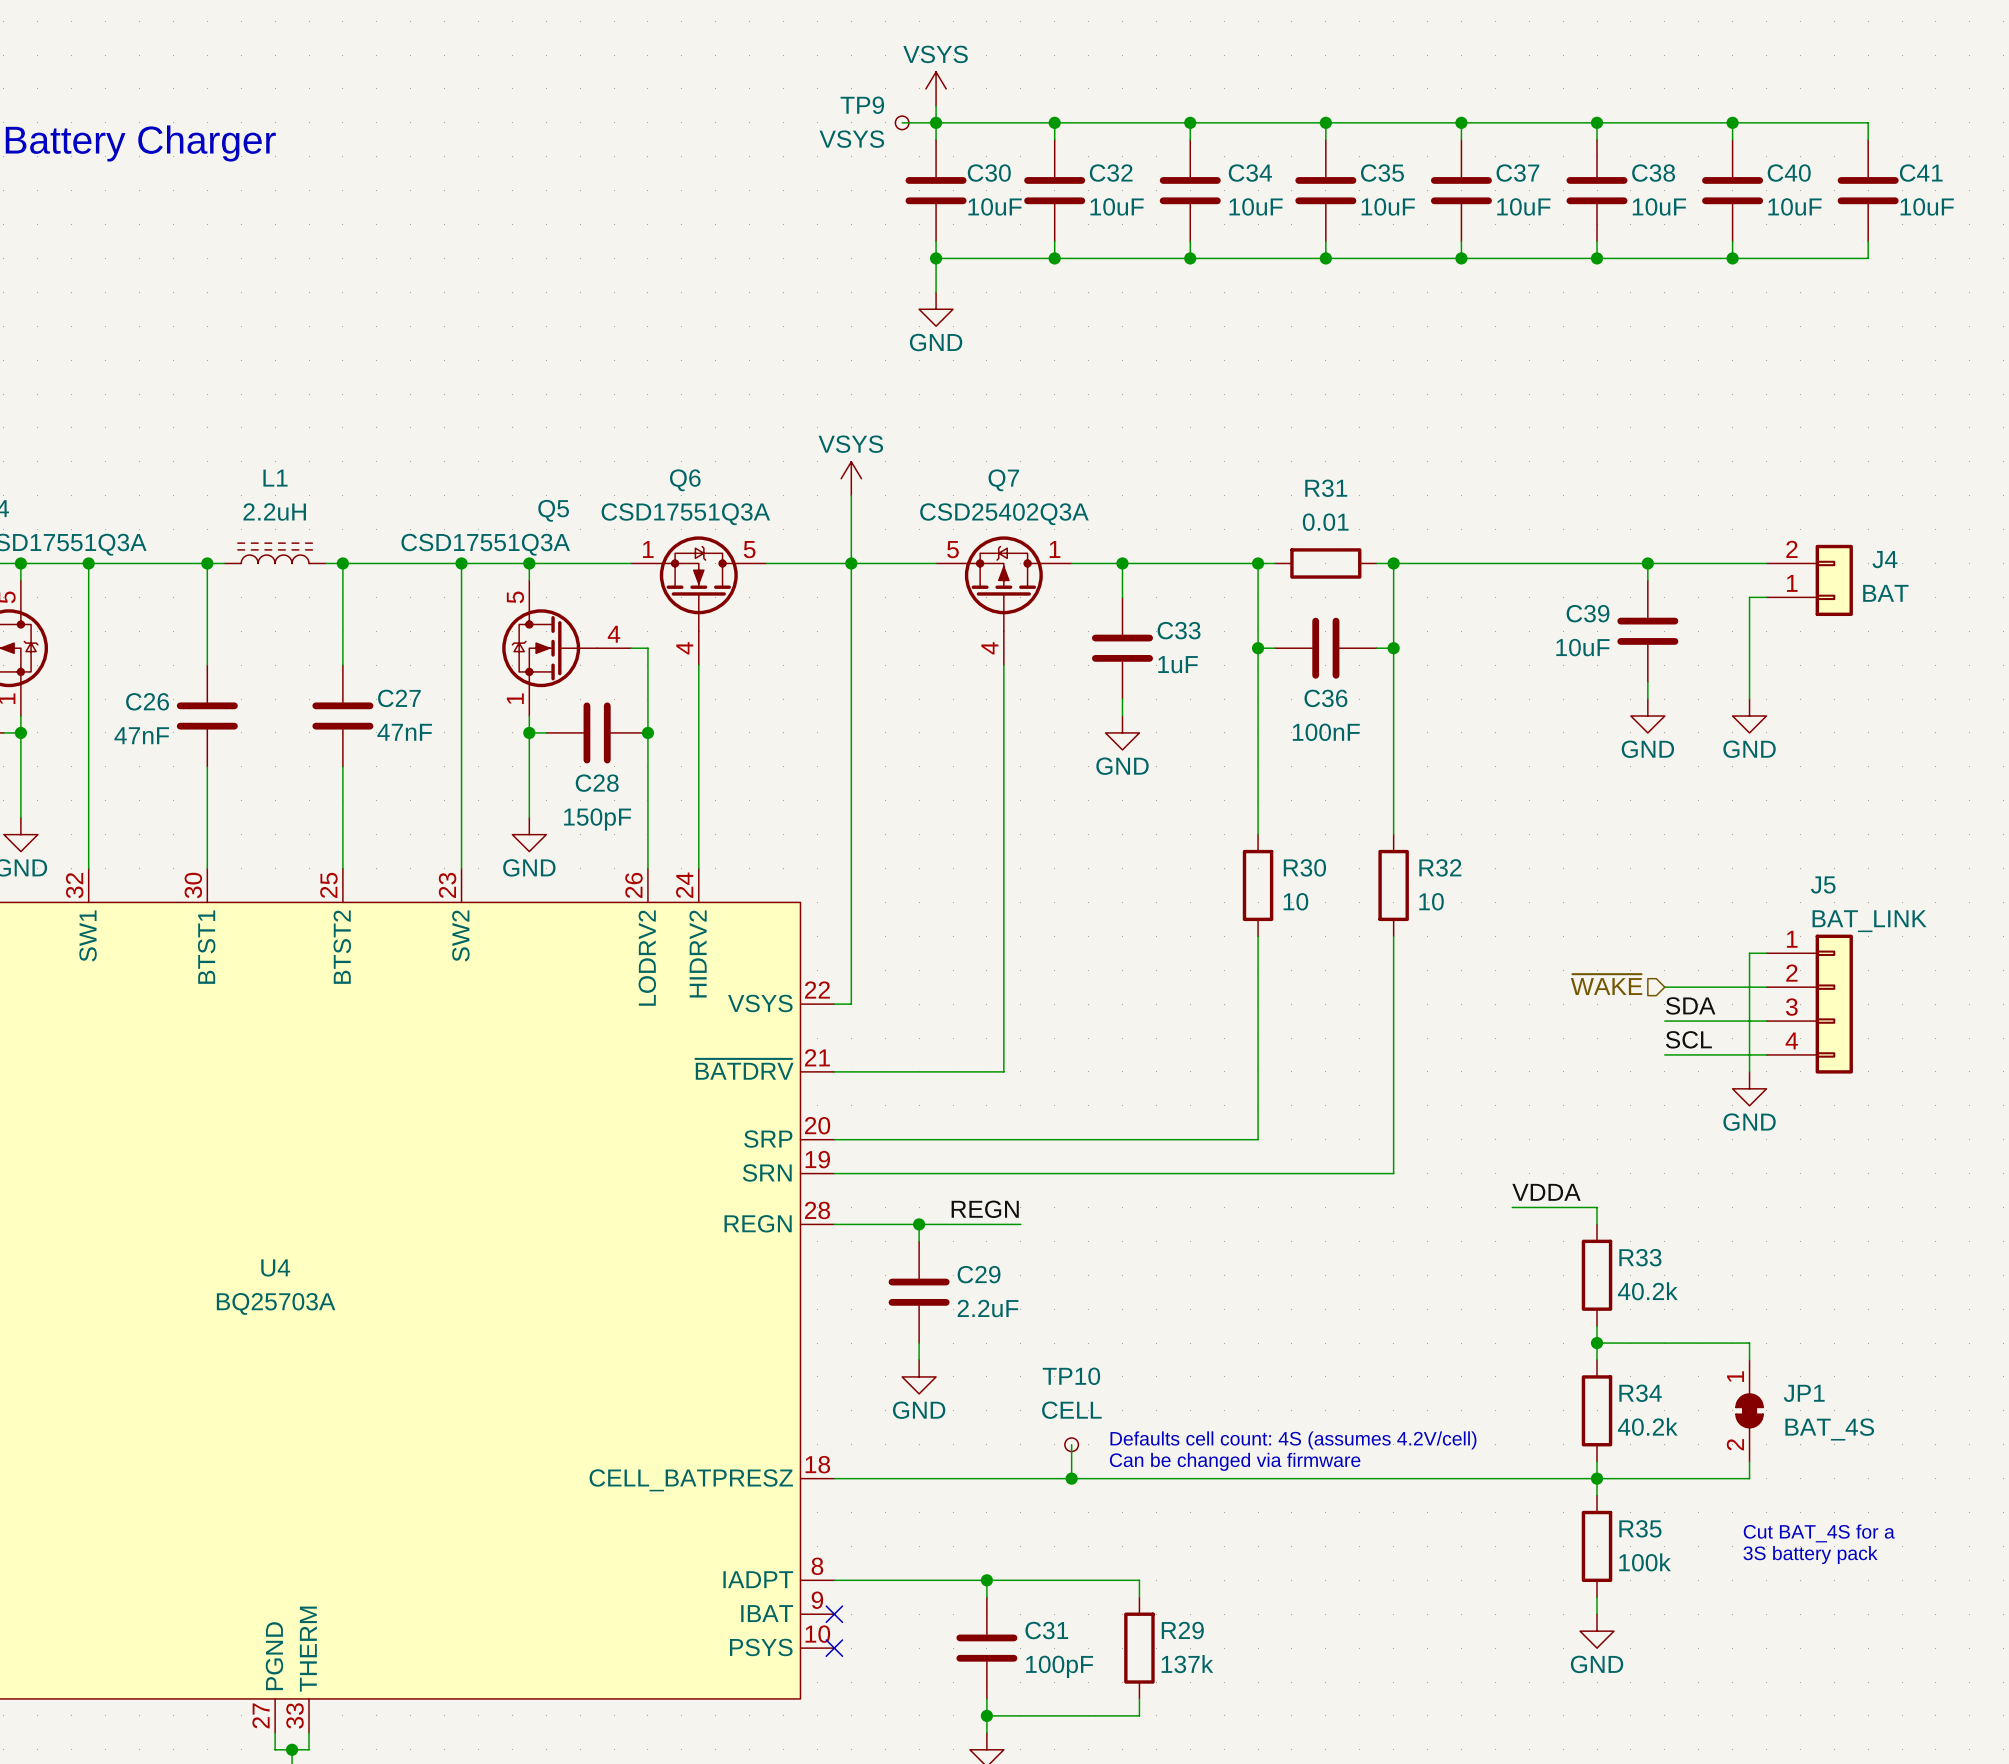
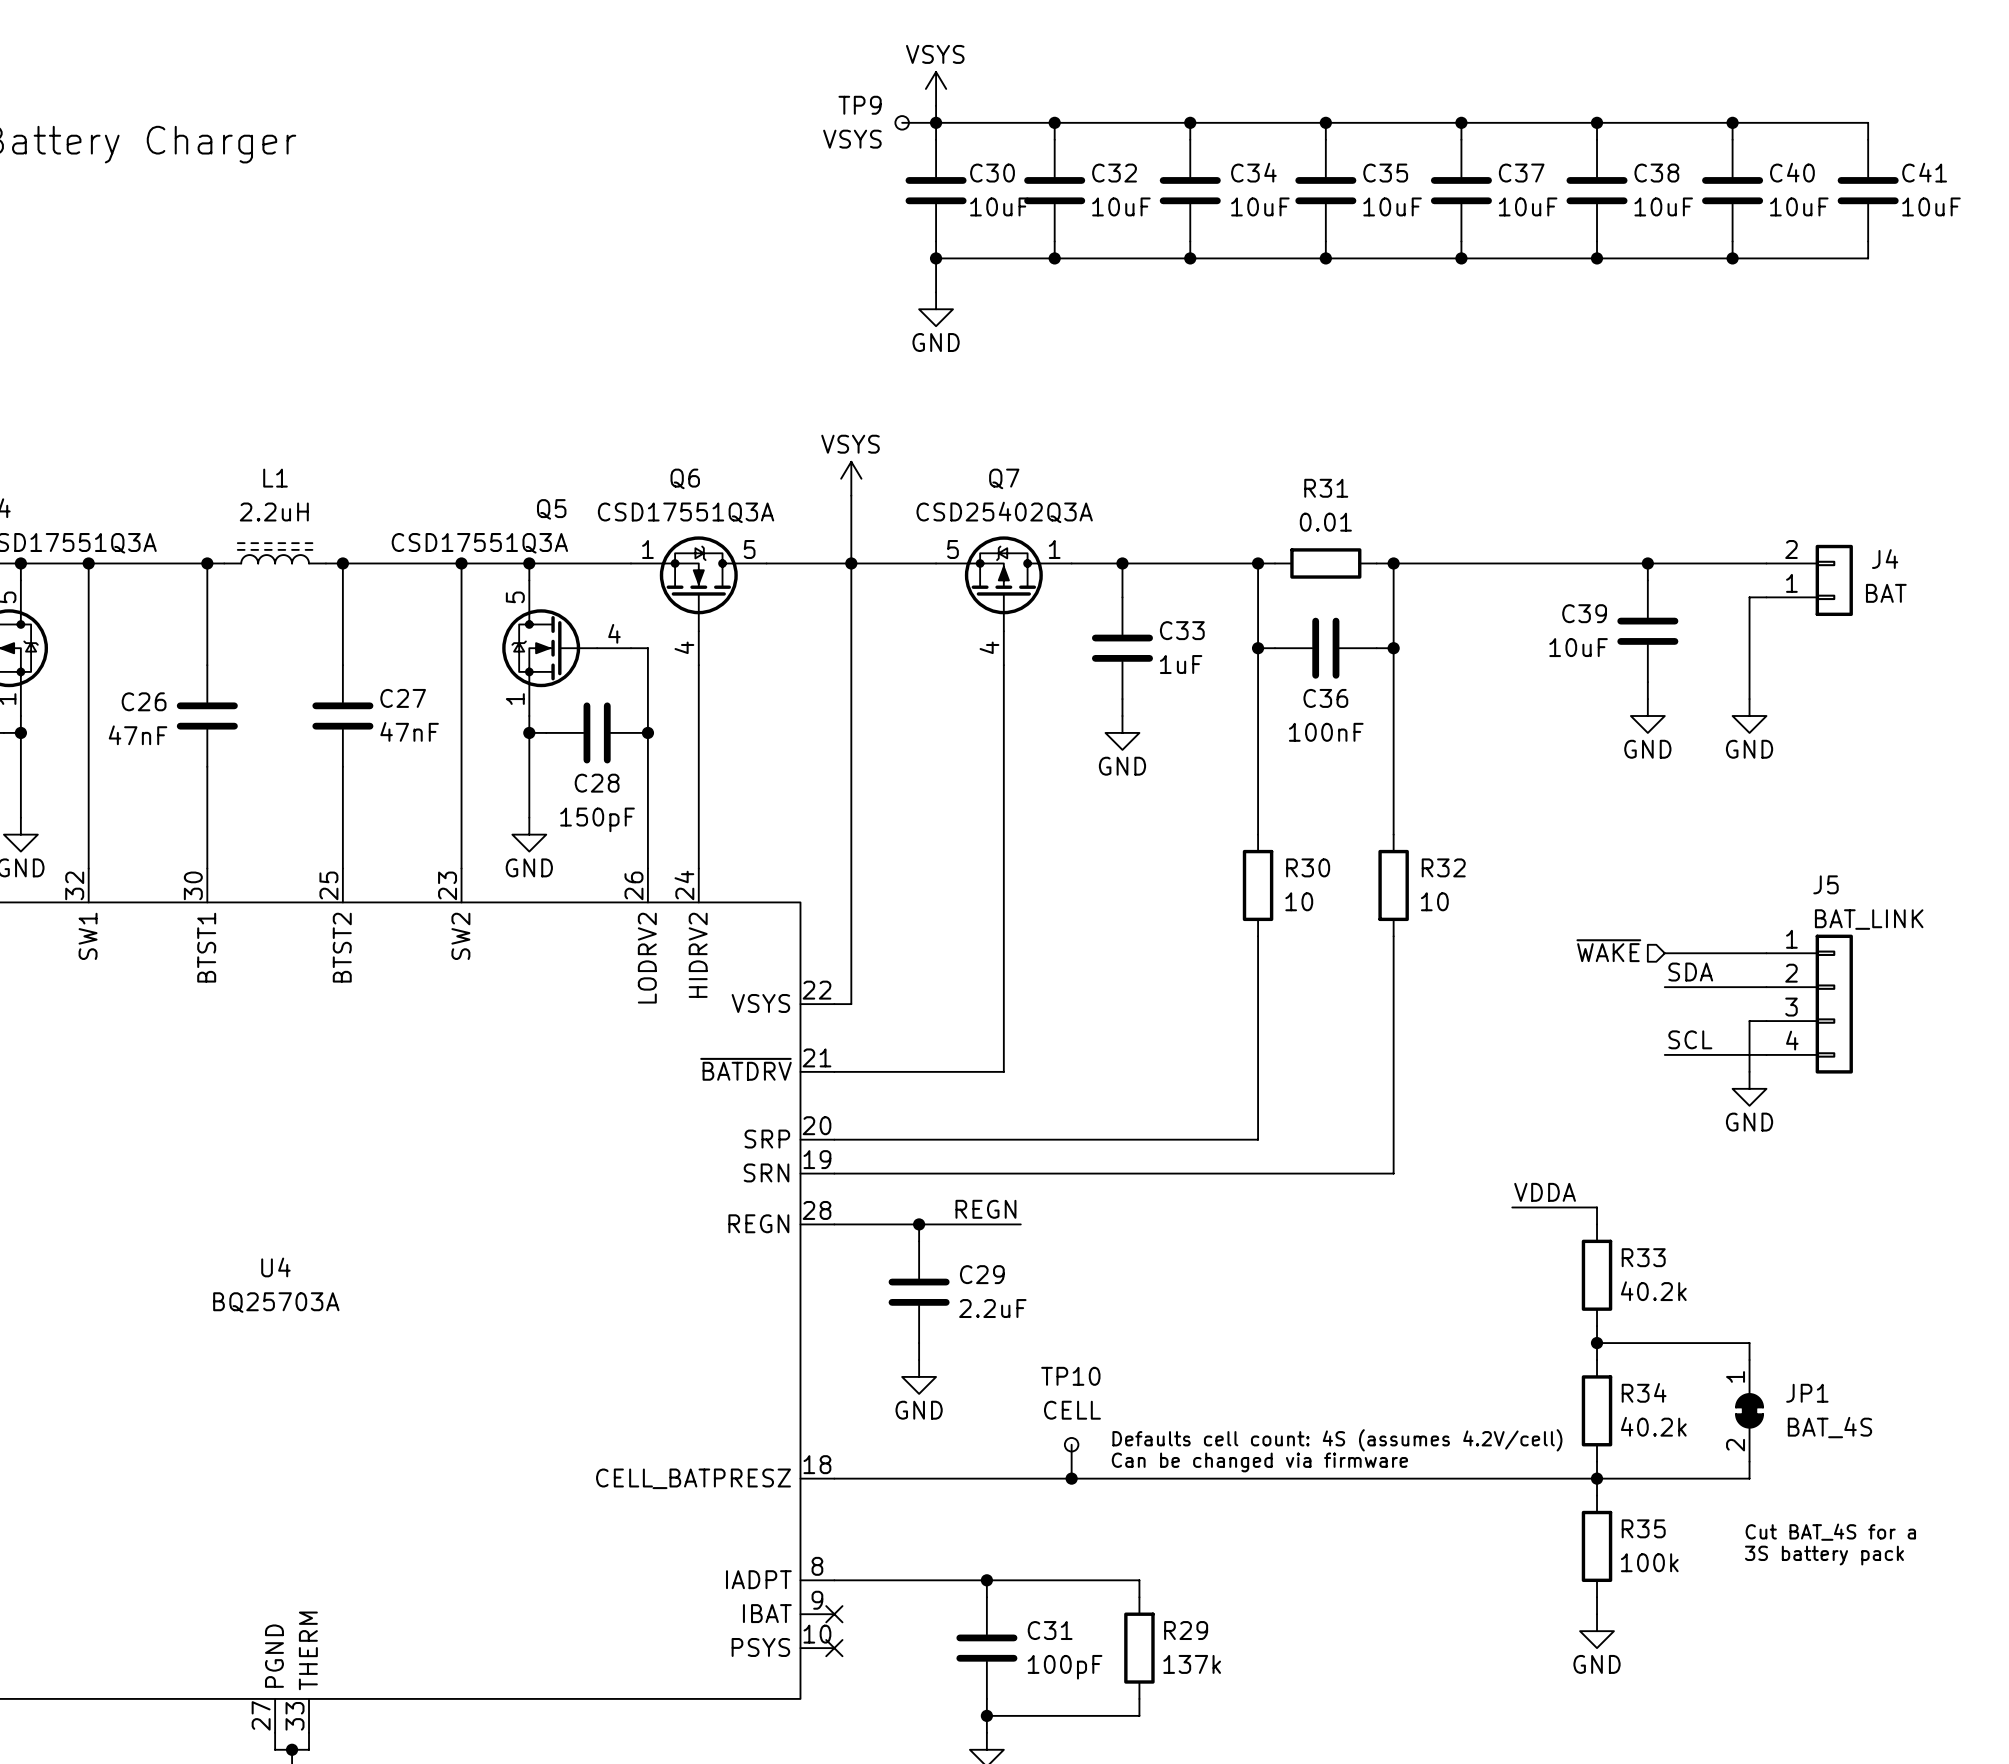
wire: (1749, 953) (1749, 1021) (1664, 1021) -> (1749, 953) (1664, 953)
hierarchical label position: ~{WAKE} (1606, 984) -> ~{WAKE} (1608, 950)
label position: SDA (1690, 1005) -> SDA (1690, 972)

